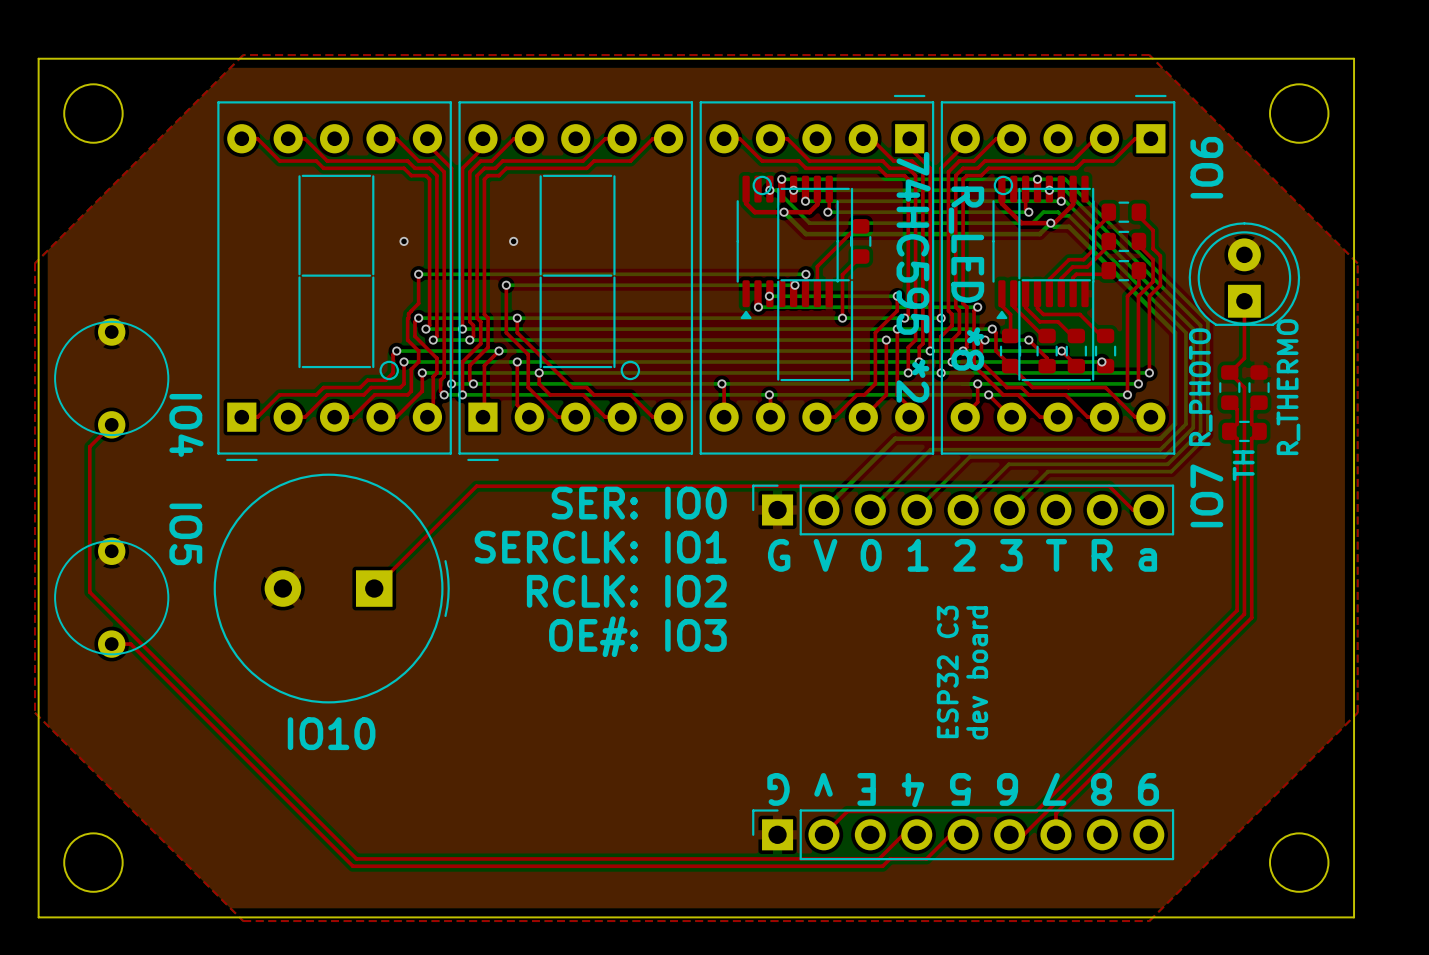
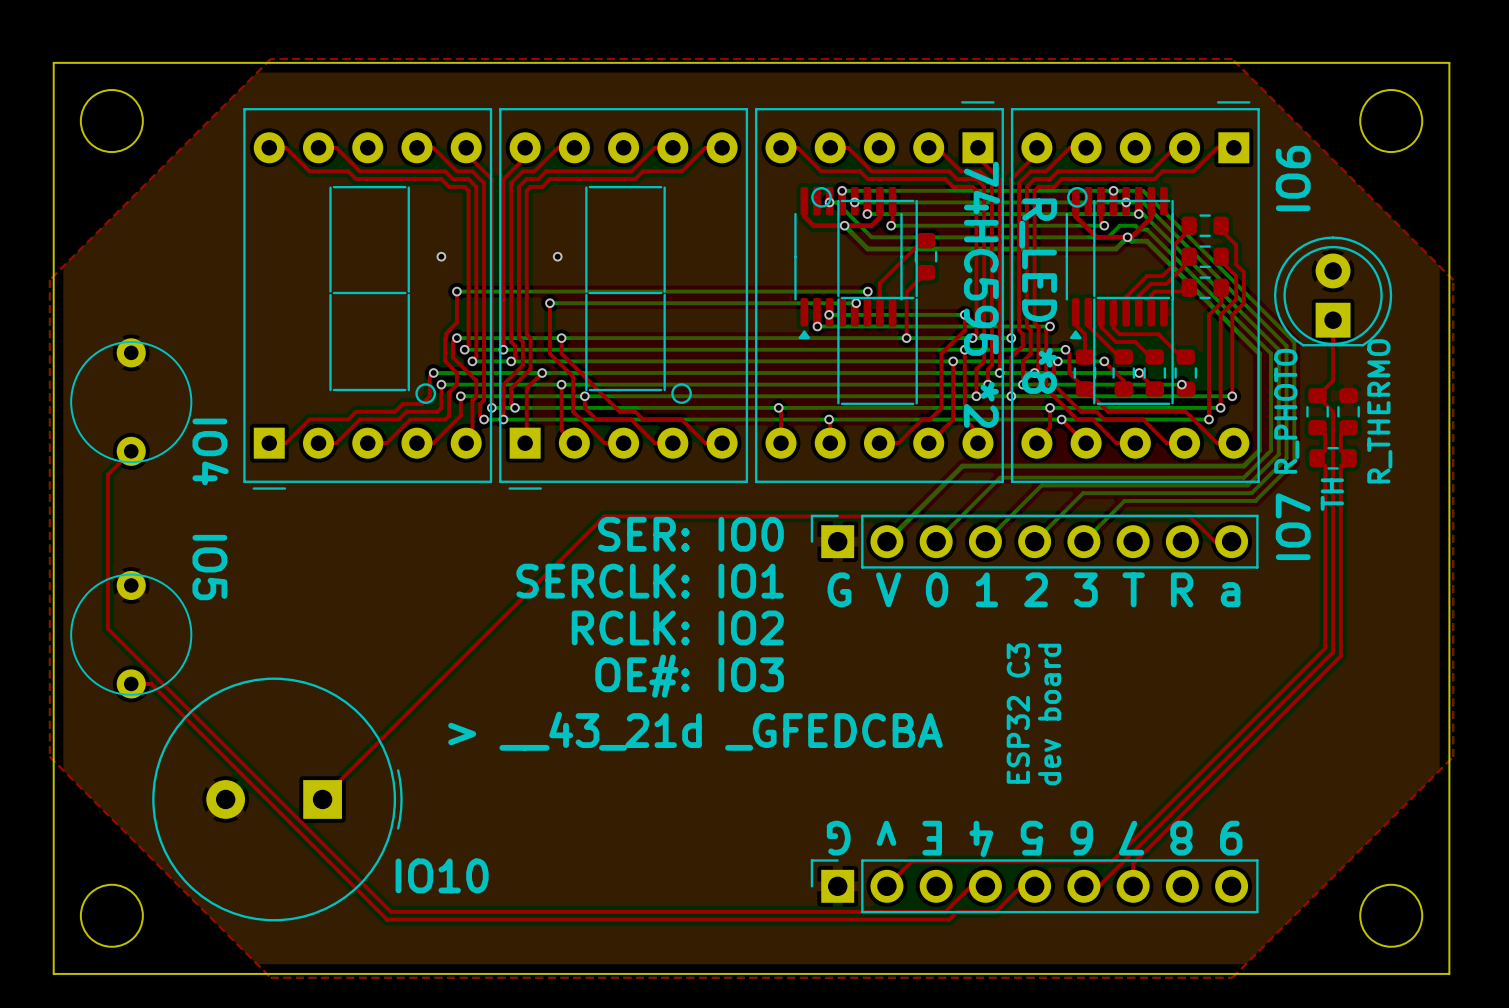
top track: (557, 486) (476, 486) (374, 588) -> (604, 516) (322, 799)
part position: (331, 588) -> (277, 799)
text: none -> > __43_21d _GFEDCBA (695, 731)
text position: IO10 (331, 733) -> IO10 (442, 875)

